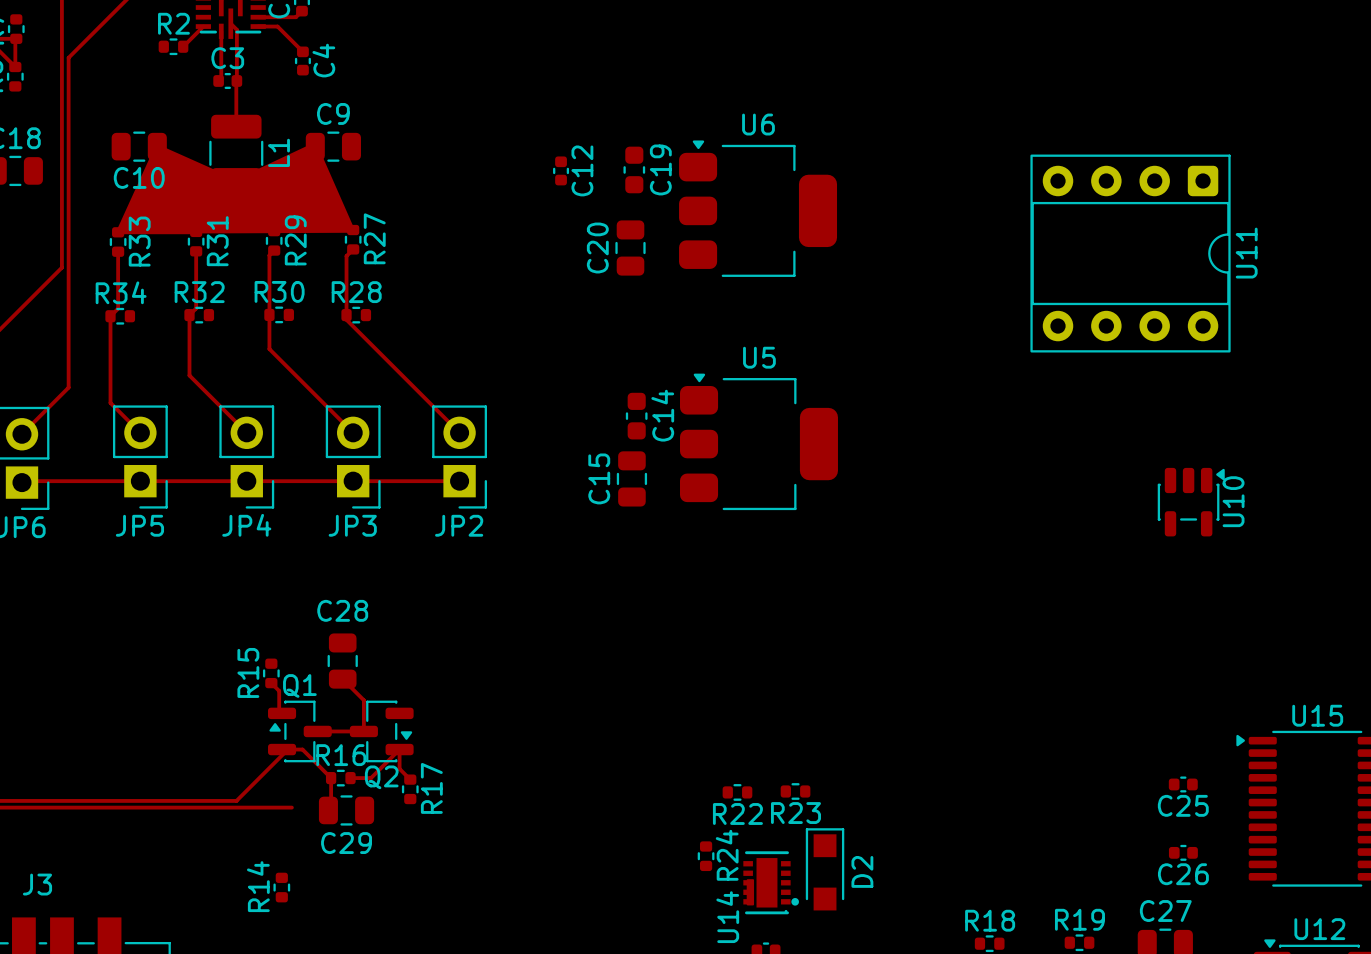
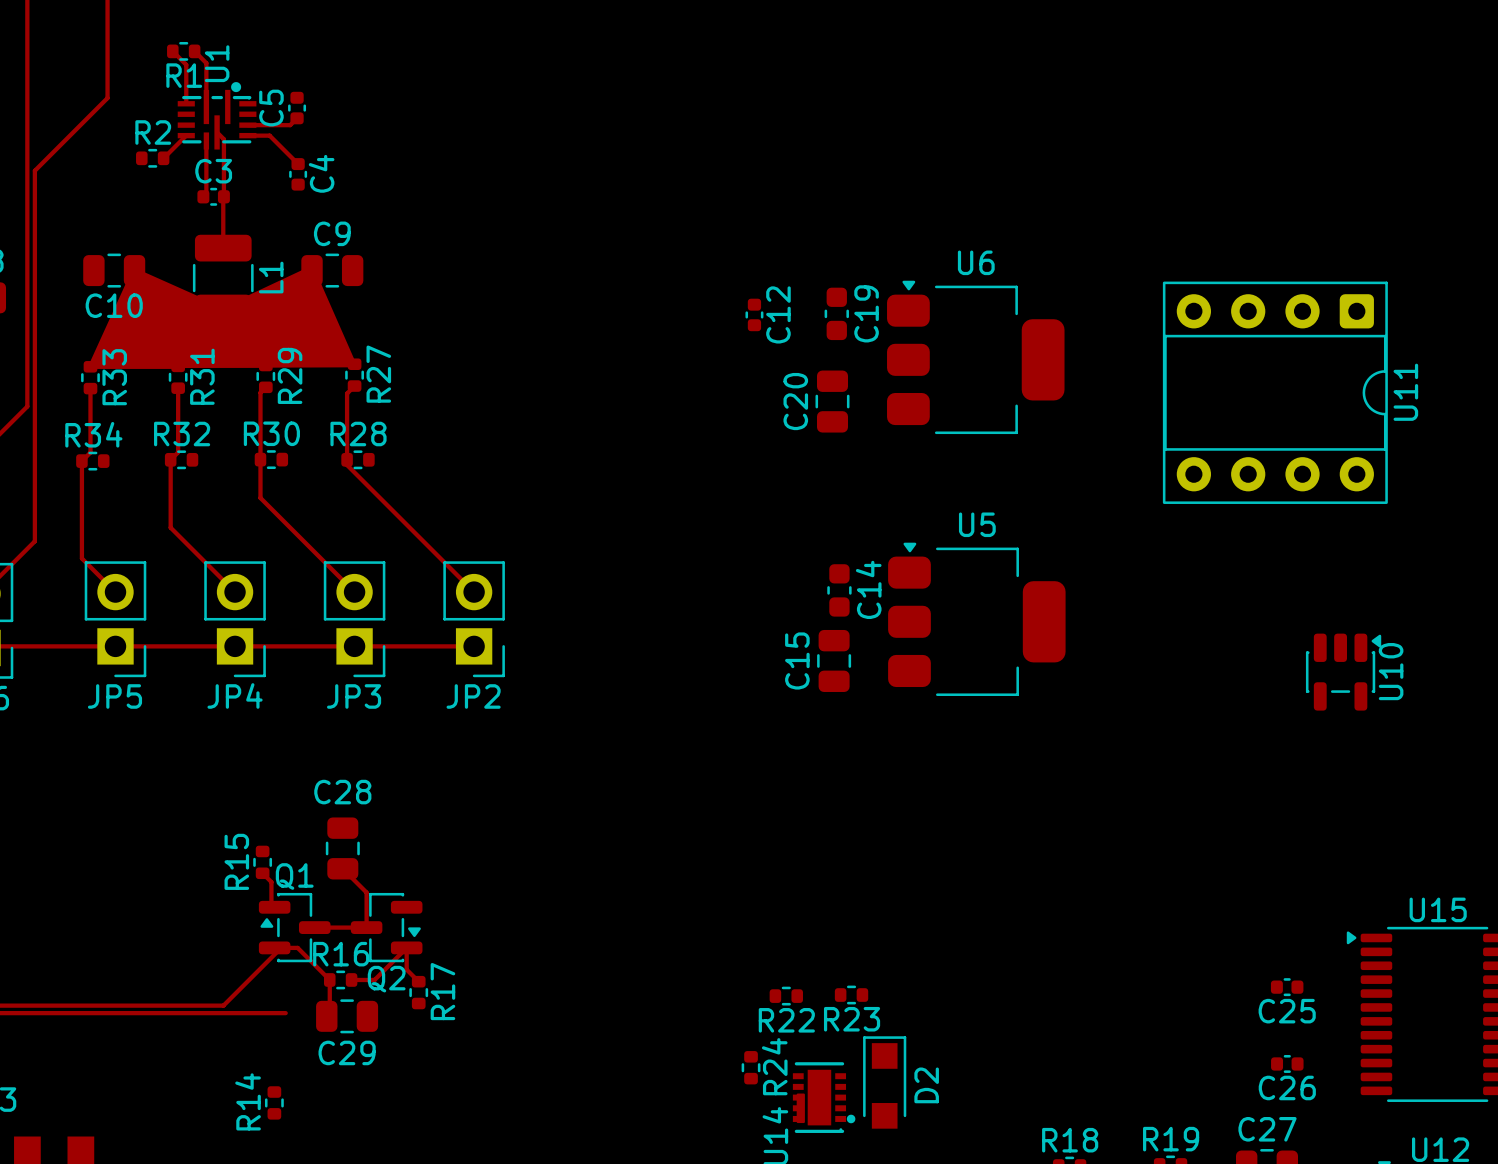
C19 position: (634, 169) -> (836, 313)
C12 position: (561, 170) -> (754, 314)
U6 position: (758, 208) -> (975, 357)
C20 position: (630, 248) -> (832, 401)
U11 position: (1130, 253) -> (1275, 392)
C14 position: (636, 416) -> (839, 590)
U5 position: (758, 441) -> (976, 619)
C15 position: (631, 478) -> (834, 660)
U10 position: (1191, 502) -> (1343, 672)

